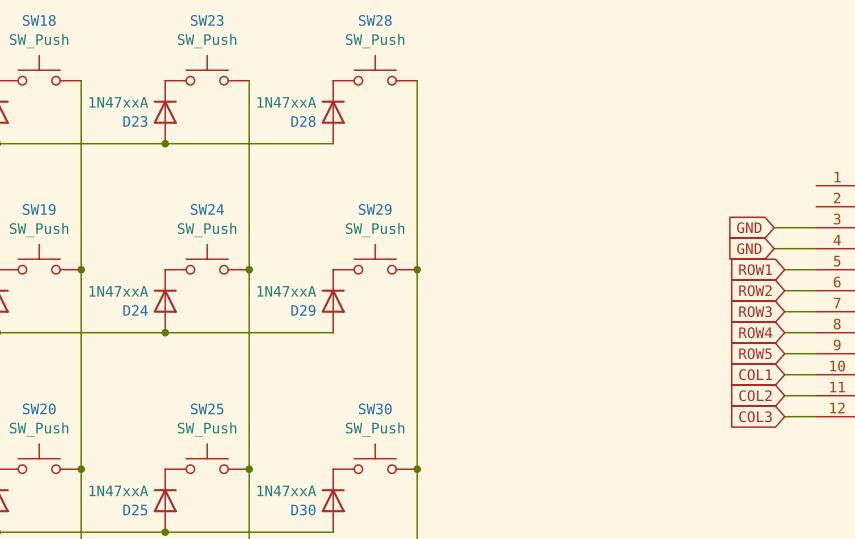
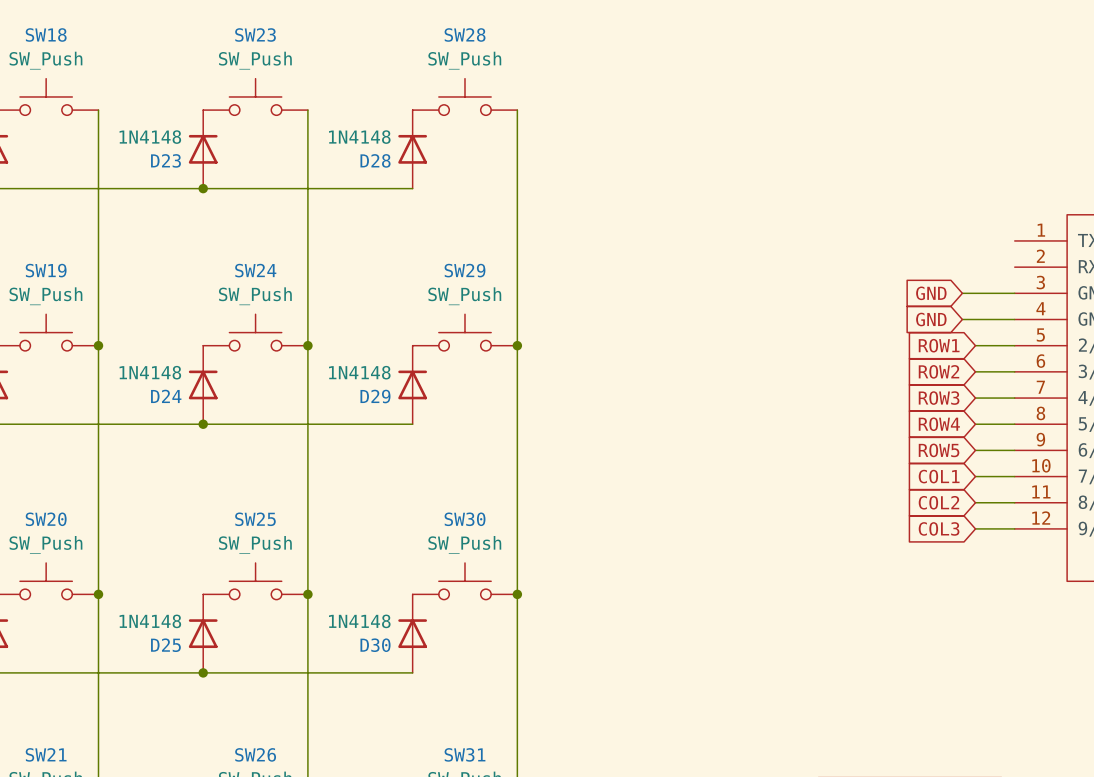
D23 value: 1N47xxA (118, 102) -> 1N4148 (150, 137)
D28 value: 1N47xxA (286, 102) -> 1N4148 (359, 137)
D24 value: 1N47xxA (118, 291) -> 1N4148 (150, 372)
D29 value: 1N47xxA (286, 291) -> 1N4148 (359, 372)
D25 value: 1N47xxA (118, 490) -> 1N4148 (150, 621)
D30 value: 1N47xxA (286, 490) -> 1N4148 (359, 621)

